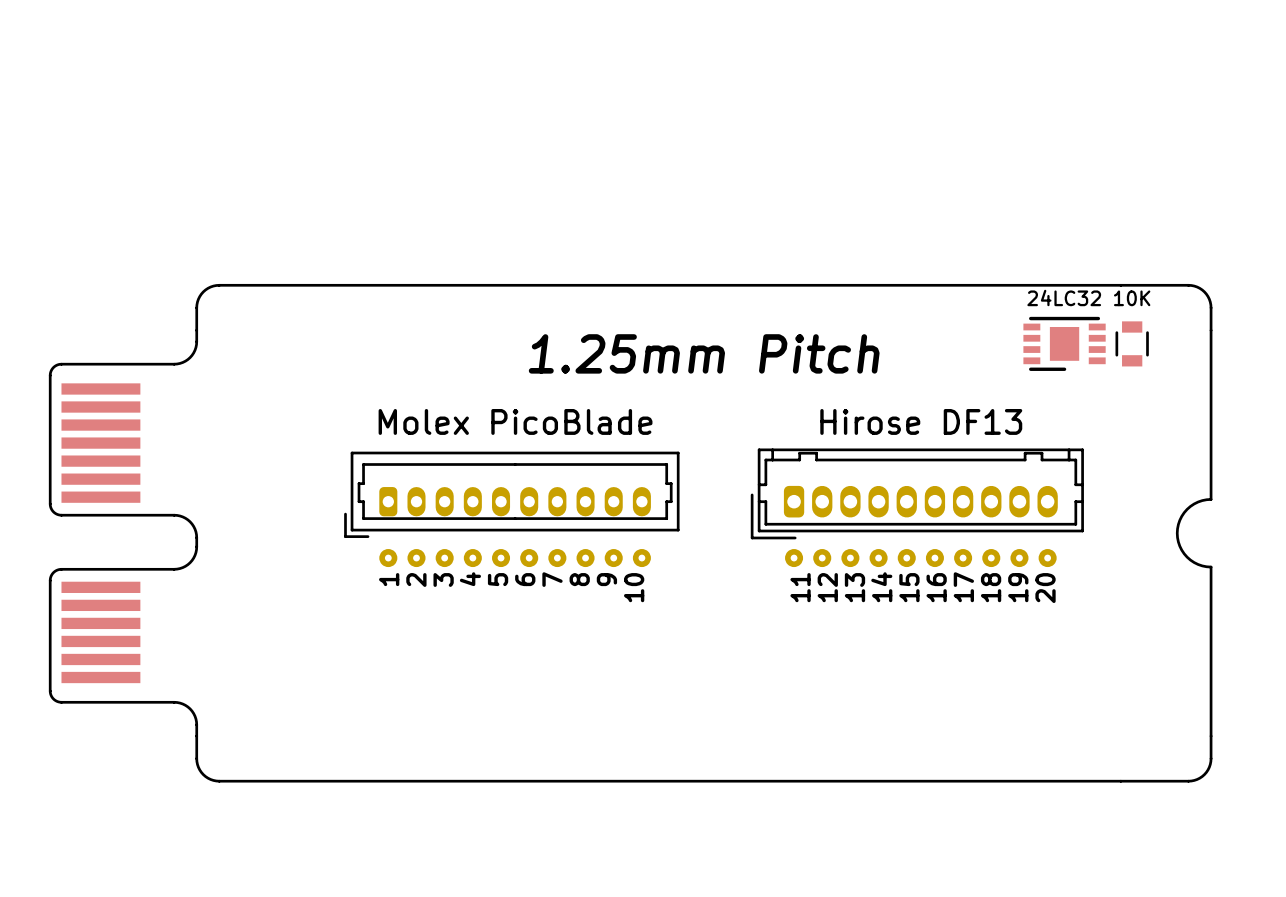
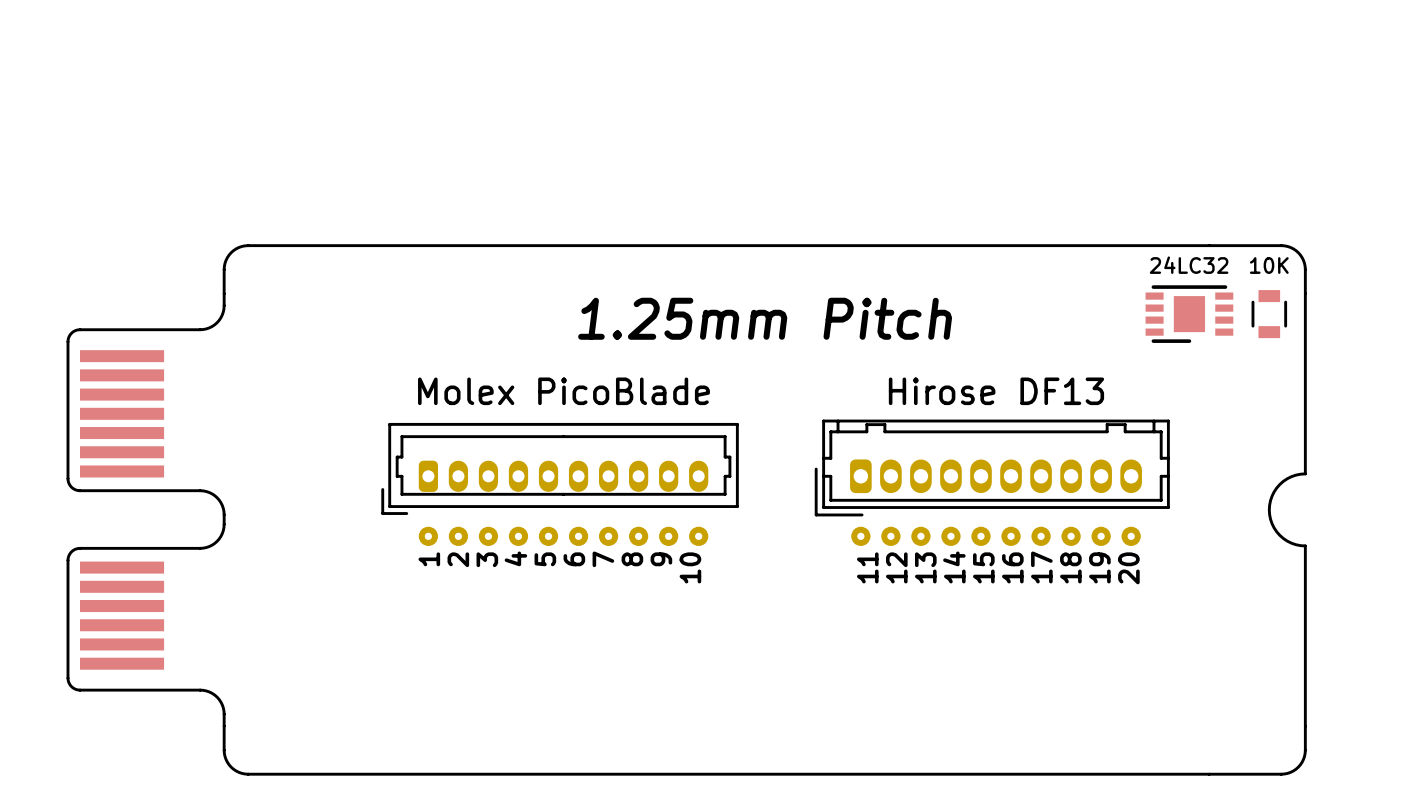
part position: (1064, 343) -> (1189, 314)
part position: (1132, 343) -> (1269, 314)

